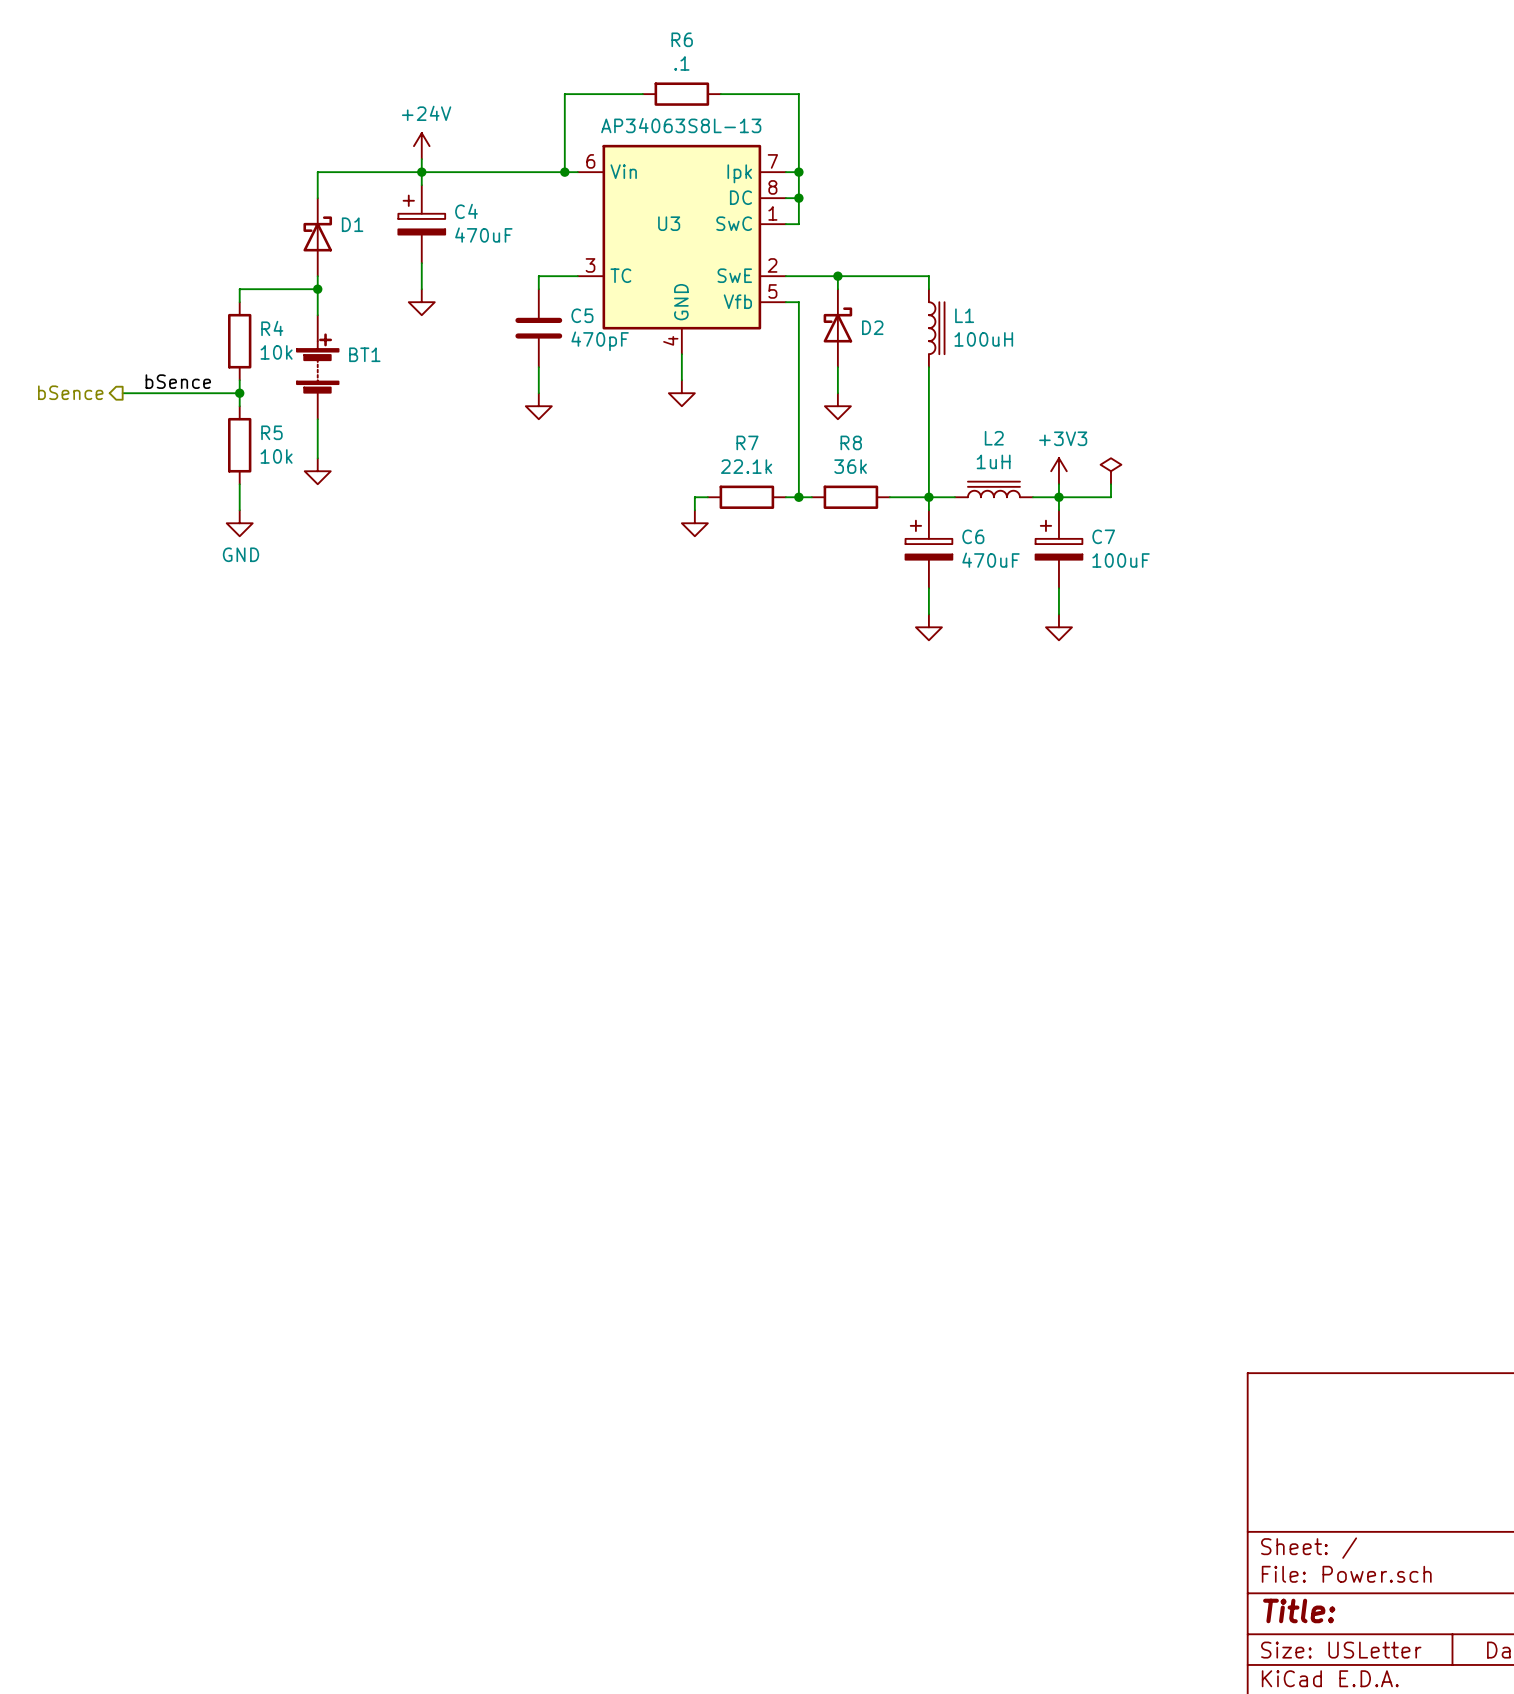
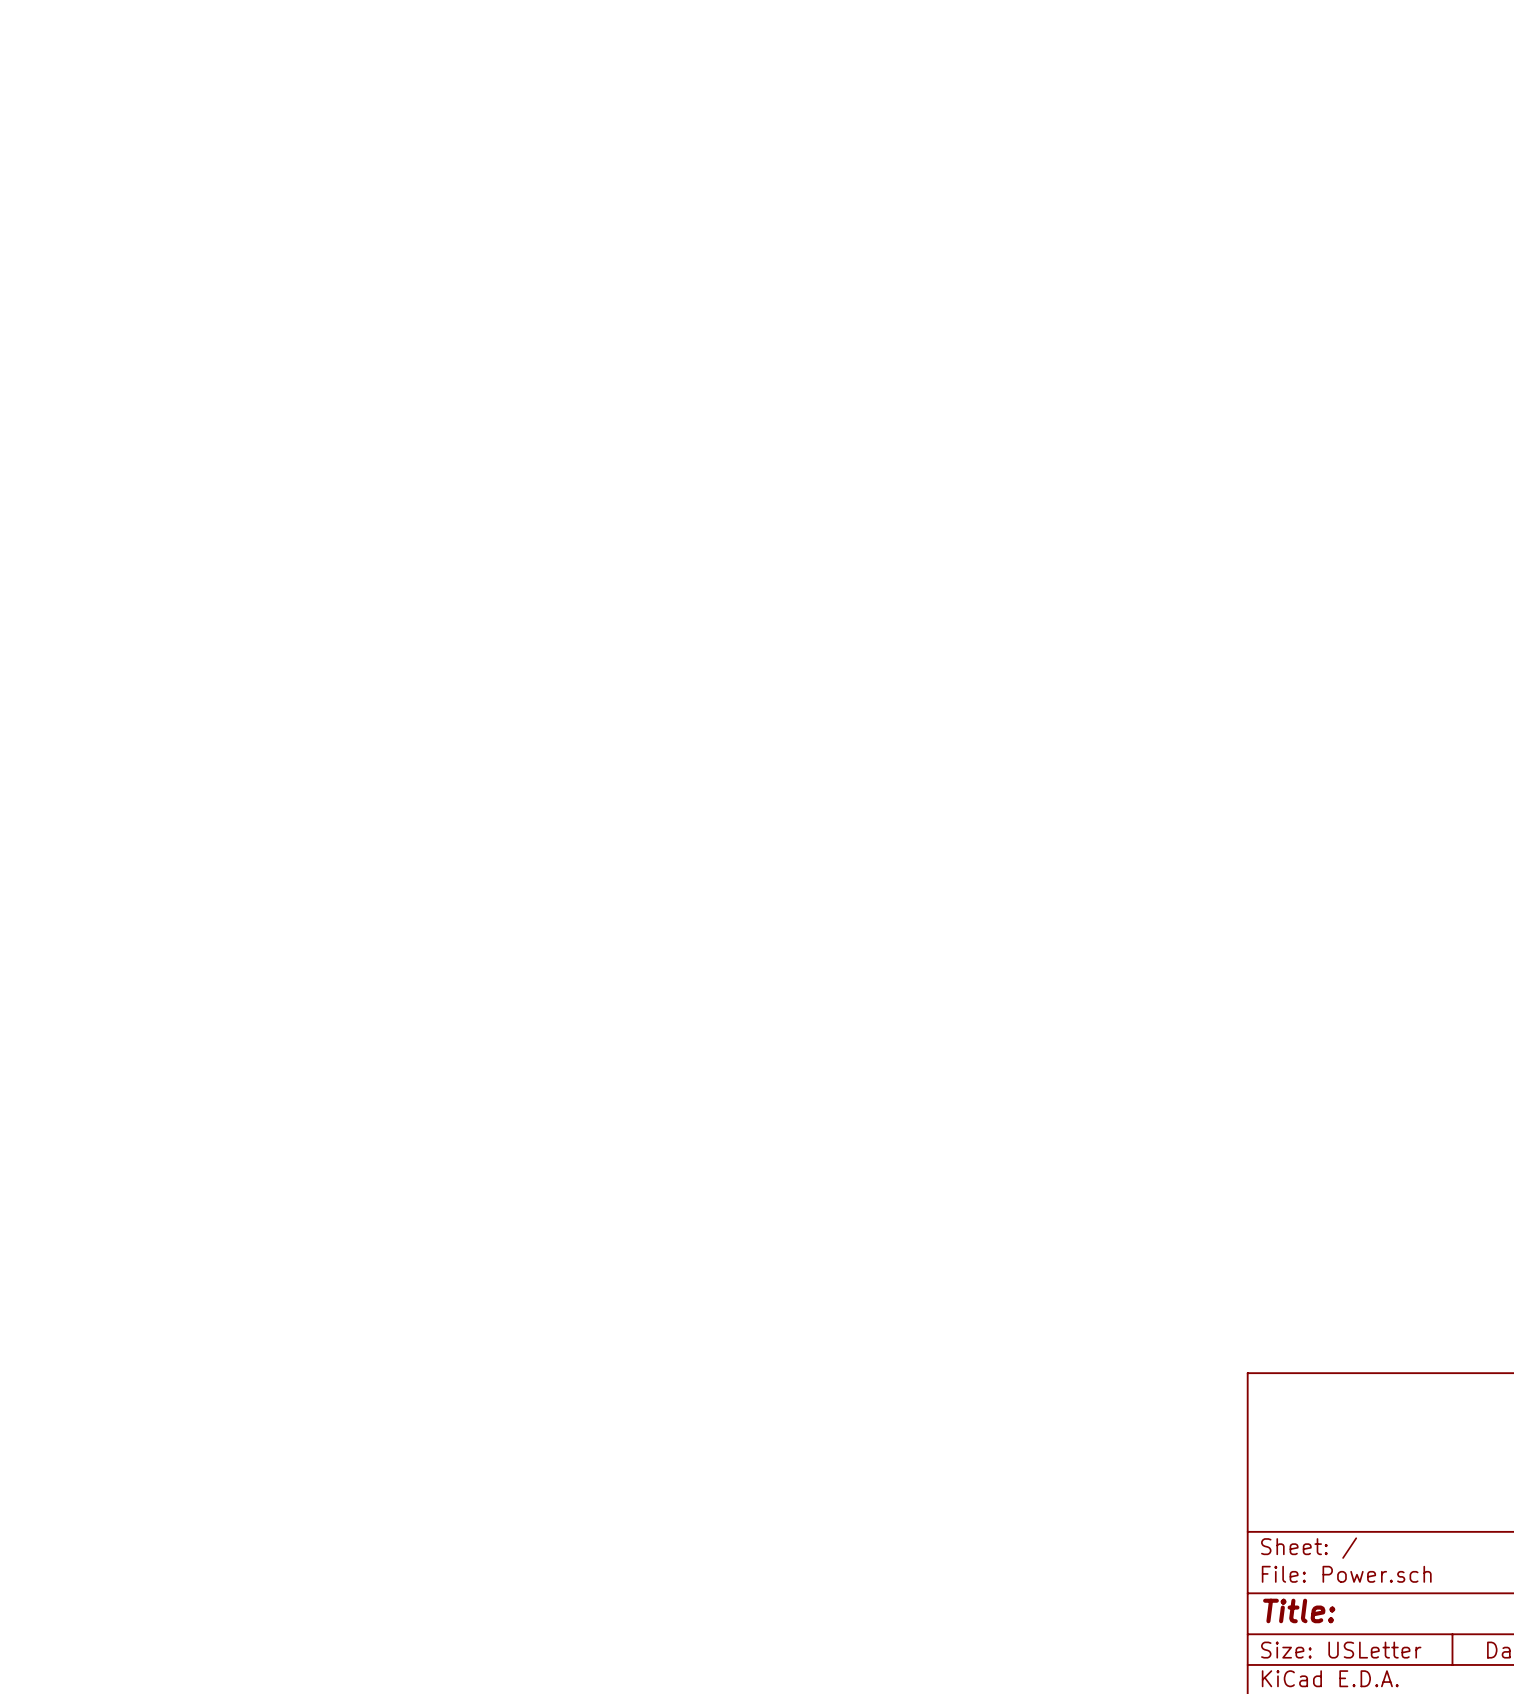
wire: (642, 94) (564, 94) (564, 172) -> none
R6: .1 (681, 94) -> none
wire: (720, 94) (798, 94) (798, 224) (785, 224) -> none
power symbol: +24V (421, 146) -> none
wire: (421, 159) (421, 185) -> none
junction: (421, 172) -> none
junction: (564, 172) -> none
wire: (577, 172) (317, 172) (317, 198) -> none
wire: (785, 172) (798, 172) -> none
junction: (798, 172) -> none
wire: (785, 198) (798, 198) -> none
junction: (798, 198) -> none
C4: 470uF (421, 224) -> none
D1: (317, 237) -> none
U3: AP34063S8L-13 (681, 249) -> none
wire: (421, 263) (421, 289) -> none
wire: (317, 276) (317, 315) -> none
wire: (577, 276) (538, 276) (538, 289) -> none
wire: (785, 276) (928, 276) (928, 289) -> none
wire: (837, 276) (837, 289) -> none
junction: (837, 276) -> none
wire: (317, 289) (239, 289) (239, 302) -> none
junction: (317, 289) -> none
power symbol: (421, 302) -> none
wire: (785, 302) (798, 302) (798, 497) -> none
C5: 470pF (538, 328) -> none
D2: (837, 328) -> none
L1: 100uH (936, 328) -> none
R4: 10k (239, 341) -> none
wire: (681, 354) (681, 380) -> none
BT1: (317, 367) -> none
wire: (538, 367) (538, 393) -> none
wire: (837, 367) (837, 393) -> none
wire: (928, 367) (928, 510) -> none
wire: (239, 380) (239, 406) -> none
label: bSence (178, 381) -> none
hierarchical label: bSence (70, 392) -> none
wire: (122, 393) (239, 393) -> none
junction: (239, 393) -> none
power symbol: (681, 393) -> none
power symbol: (538, 406) -> none
power symbol: (837, 406) -> none
wire: (317, 419) (317, 458) -> none
R5: 10k (239, 445) -> none
power symbol: (317, 471) -> none
power symbol: +3V3 (1058, 471) -> none
power symbol: (1110, 471) -> none
wire: (239, 484) (239, 510) -> none
wire: (1058, 484) (1058, 510) -> none
wire: (1110, 484) (1110, 497) (1032, 497) -> none
L2: 1uH (993, 489) -> none
wire: (707, 497) (694, 497) (694, 510) -> none
R7: 22.1k (746, 497) -> none
wire: (785, 497) (811, 497) -> none
junction: (798, 497) -> none
R8: 36k (850, 497) -> none
wire: (889, 497) (954, 497) -> none
junction: (928, 497) -> none
junction: (1058, 497) -> none
power symbol: GND (239, 523) -> none
power symbol: (694, 523) -> none
C6: 470uF (928, 549) -> none
C7: 100uF (1058, 549) -> none
wire: (928, 588) (928, 614) -> none
wire: (1058, 588) (1058, 614) -> none
power symbol: (928, 627) -> none
power symbol: (1058, 627) -> none

